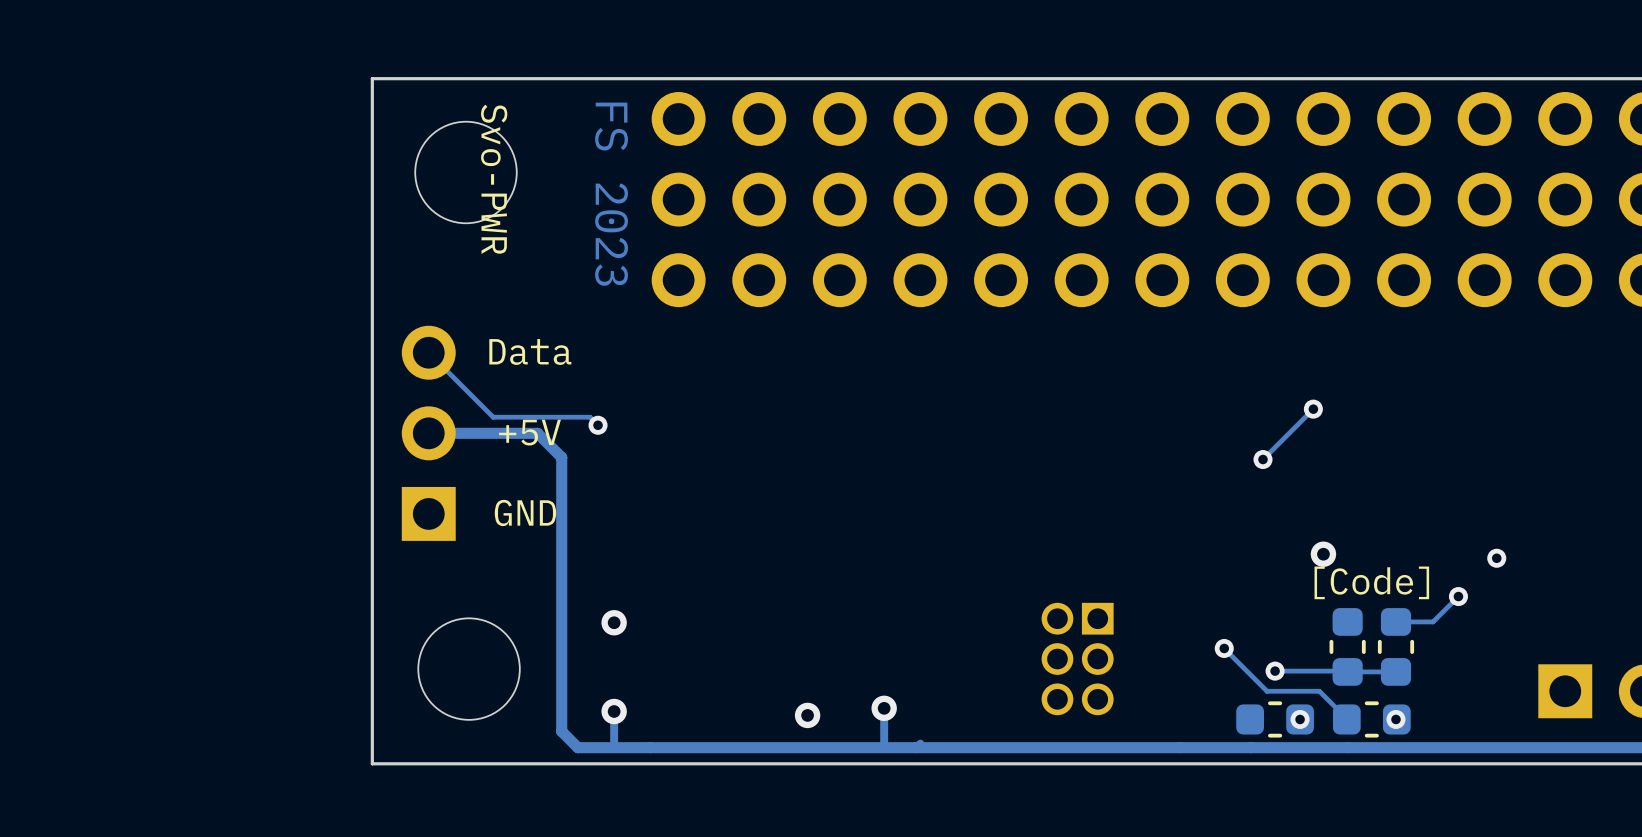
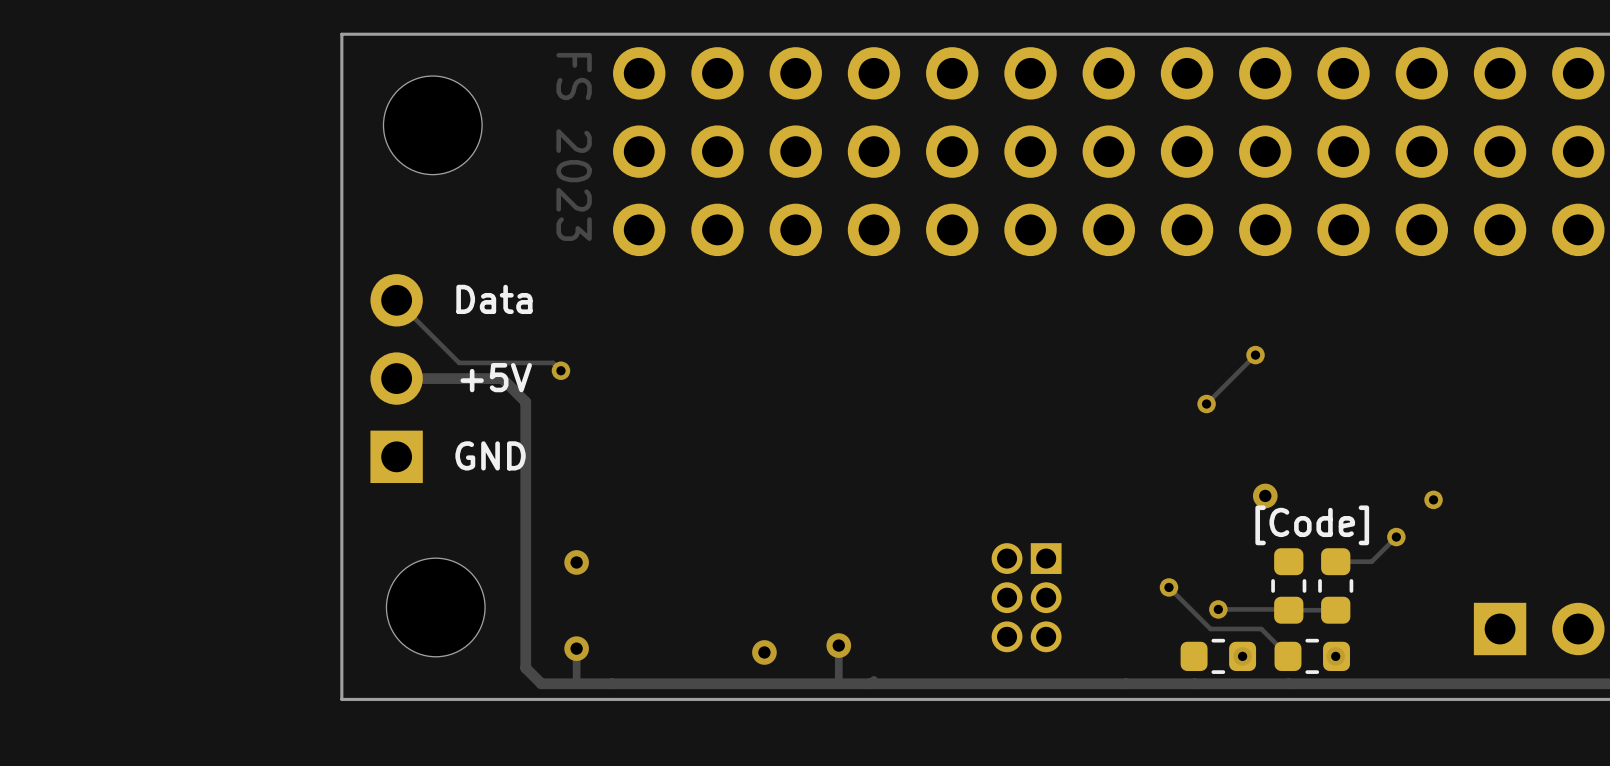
text: Svo-PWR (494, 179) -> none

